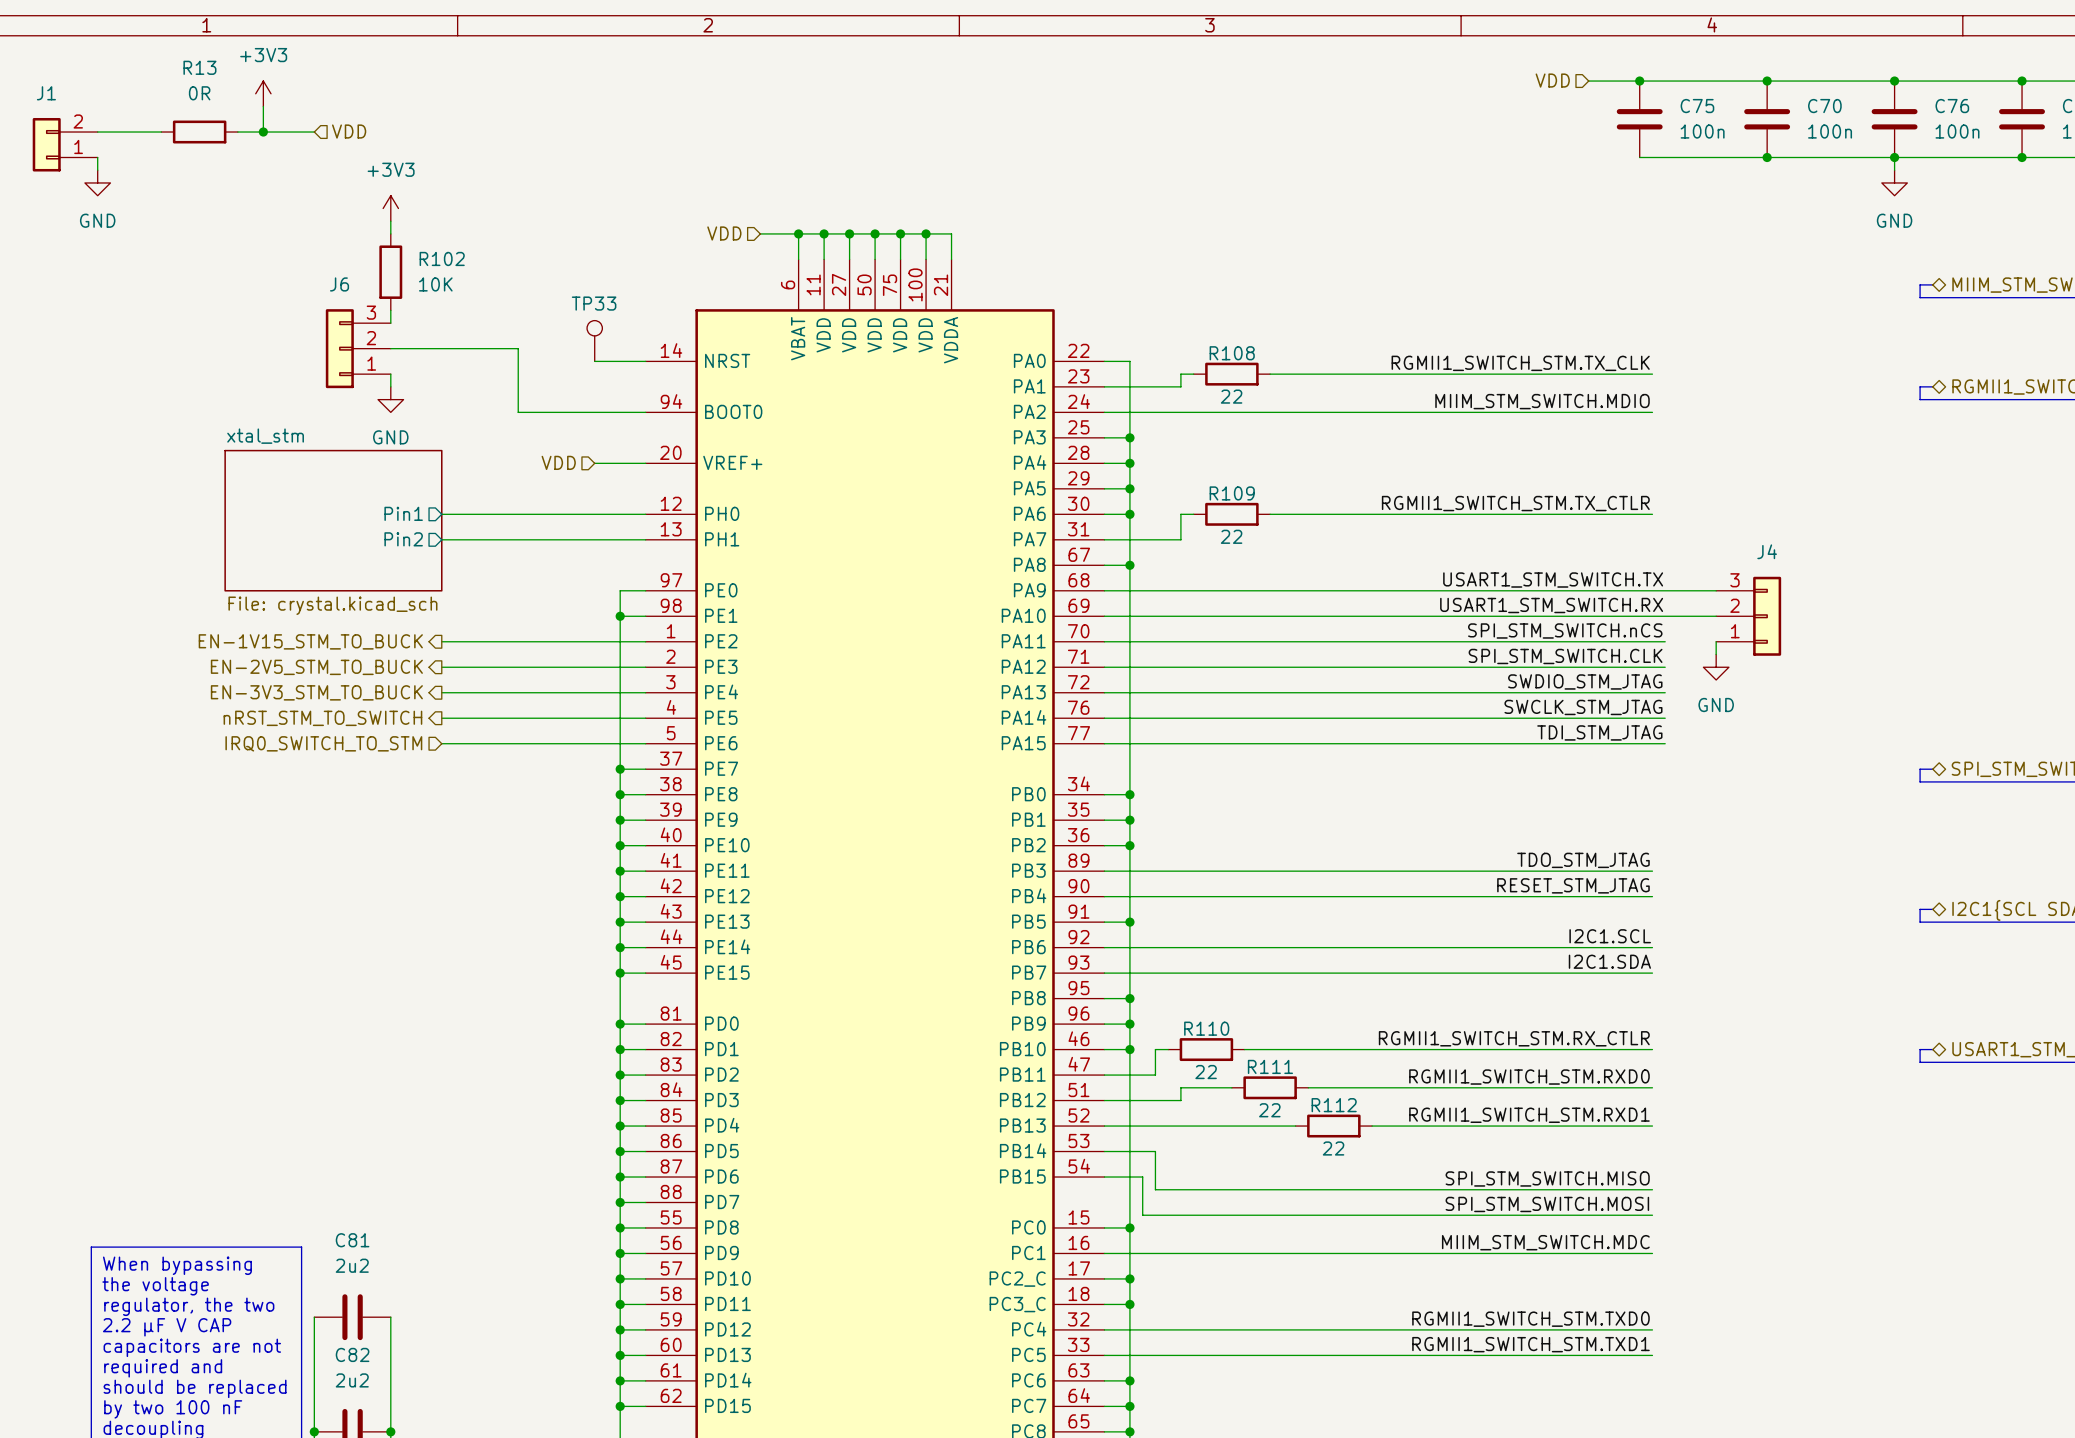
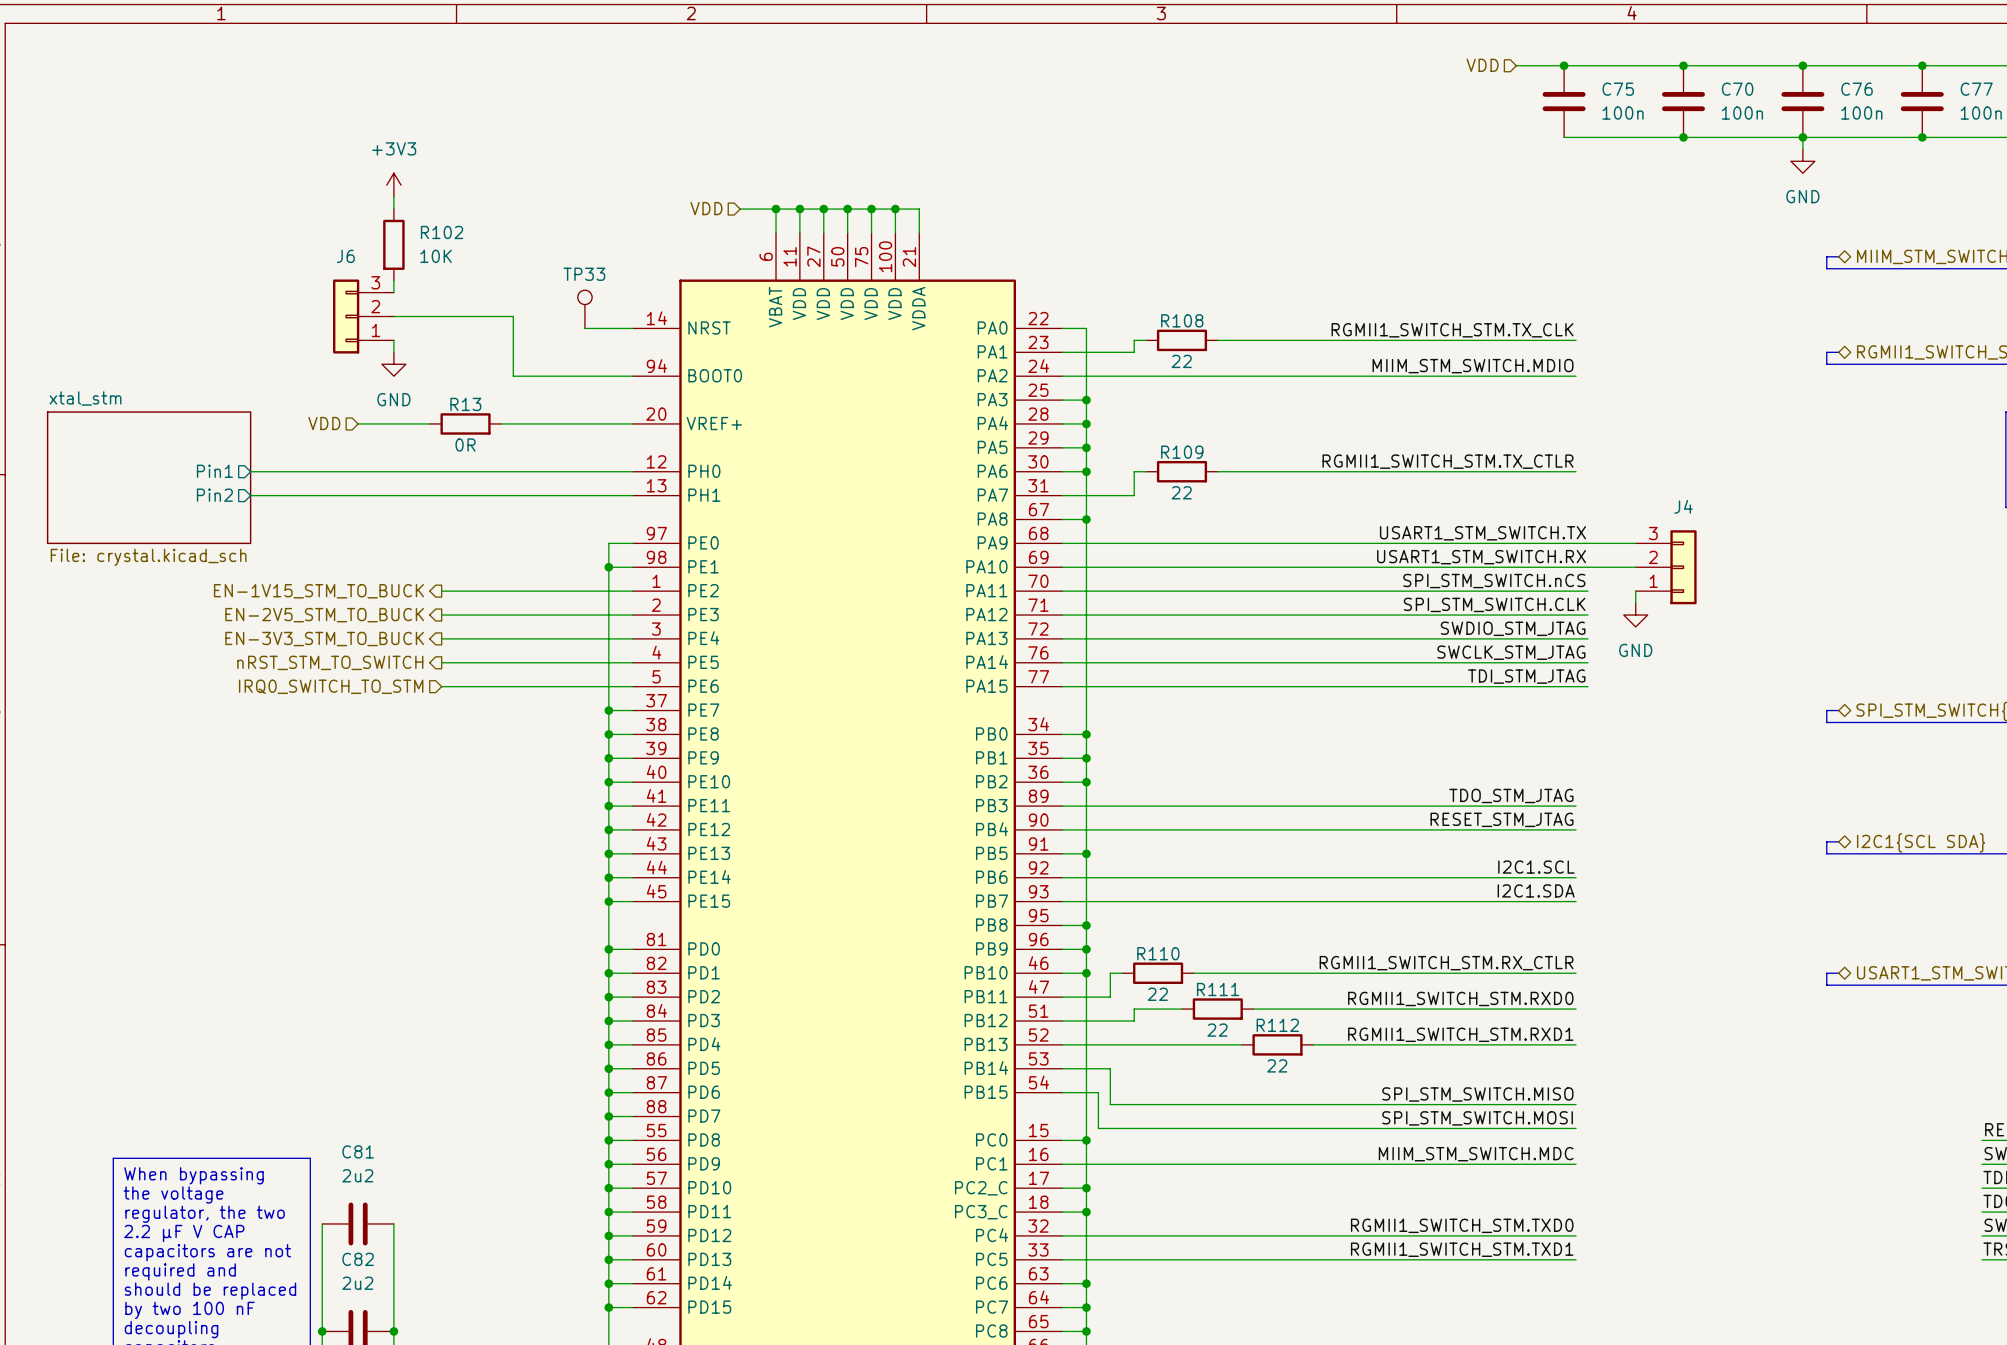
R13 name position: R13 (199, 67) -> R13 (465, 404)
R13 value position: 0R (199, 93) -> 0R (465, 445)
power symbol: +3V3 (263, 93) -> none
wire: (263, 106) (263, 132) -> none
hierarchical label: VDD (349, 131) -> none
wire: (97, 132) (161, 132) -> none
R13 position: (199, 132) -> (465, 423)
wire: (237, 132) (314, 132) -> none
junction: (263, 132) -> none
J1: (65, 144) -> none
wire: (97, 157) (97, 170) -> none
power symbol: GND (97, 182) -> none
hierarchical label: none -> VDD (324, 423)
hierarchical label: VDD (558, 462) -> none
wire: none -> (358, 423) (429, 423)
wire: none -> (501, 423) (584, 423)
sheet pin position: Pin1 (403, 513) -> Pin1 (214, 471)
wire: none -> (250, 471) (441, 471)
sheet xtal_stm position: (333, 520) -> (149, 477)
wire: none -> (250, 495) (441, 495)
sheet pin position: Pin2 (403, 539) -> Pin2 (214, 495)

